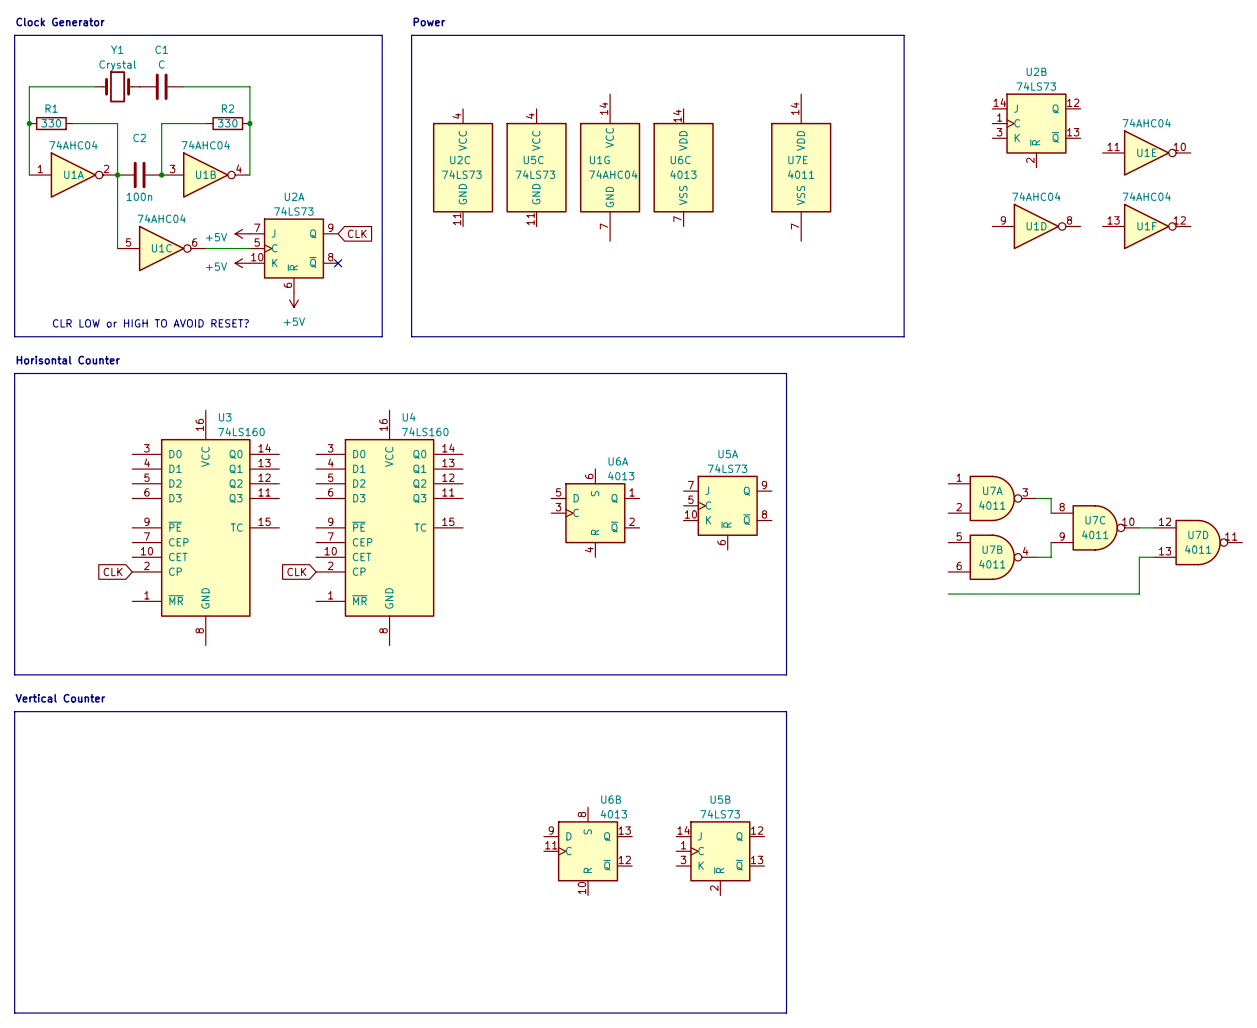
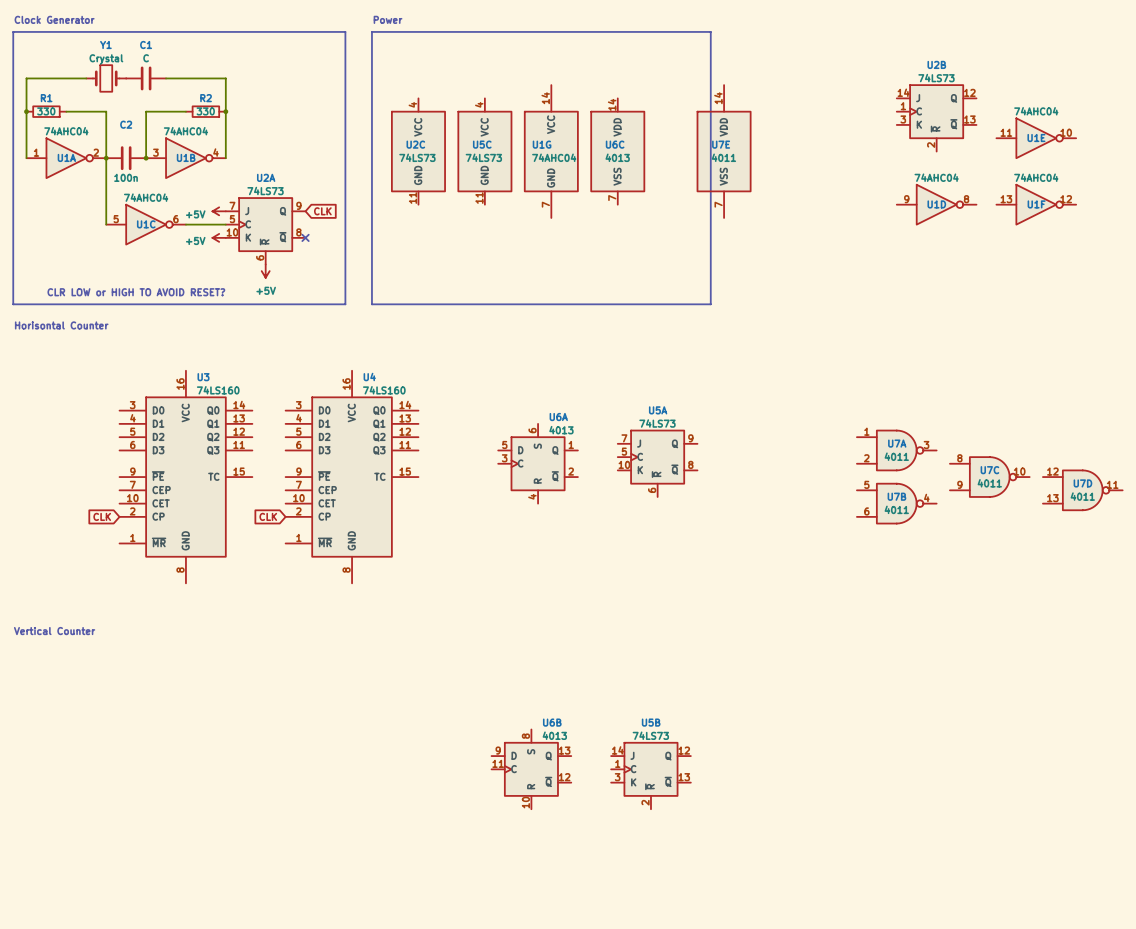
line: (786, 35) (904, 35) (904, 336) (786, 336) -> (710, 31) (710, 304)
line: (14, 373) (786, 373) (786, 674) (14, 674) (14, 373) -> none
wire: (1036, 498) (1051, 498) (1051, 513) -> none
wire: (1139, 527) (1154, 527) -> none
wire: (1051, 542) (1051, 557) (1036, 557) -> none
wire: (1154, 557) (1139, 557) (1139, 594) (948, 594) -> none
line: (14, 711) (14, 1013) (786, 1013) (786, 711) (14, 711) -> none

